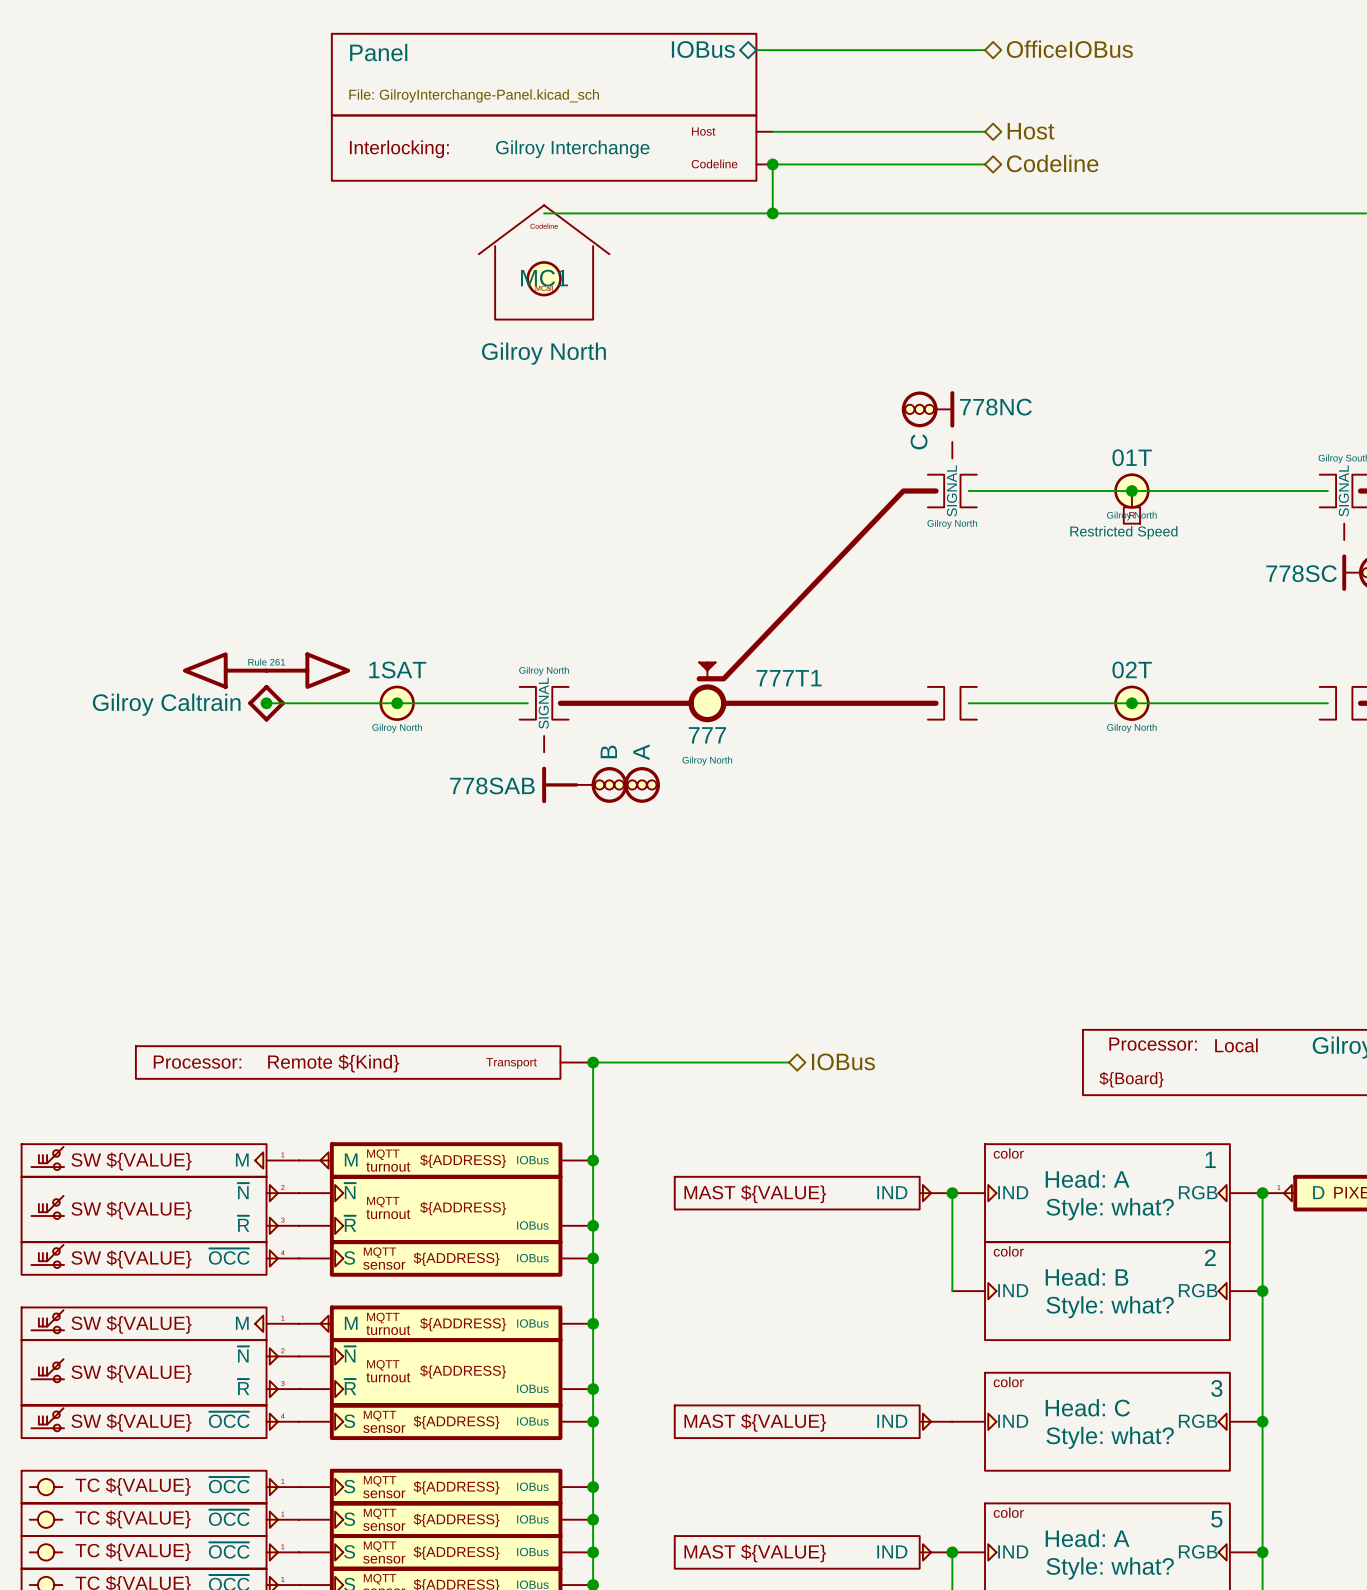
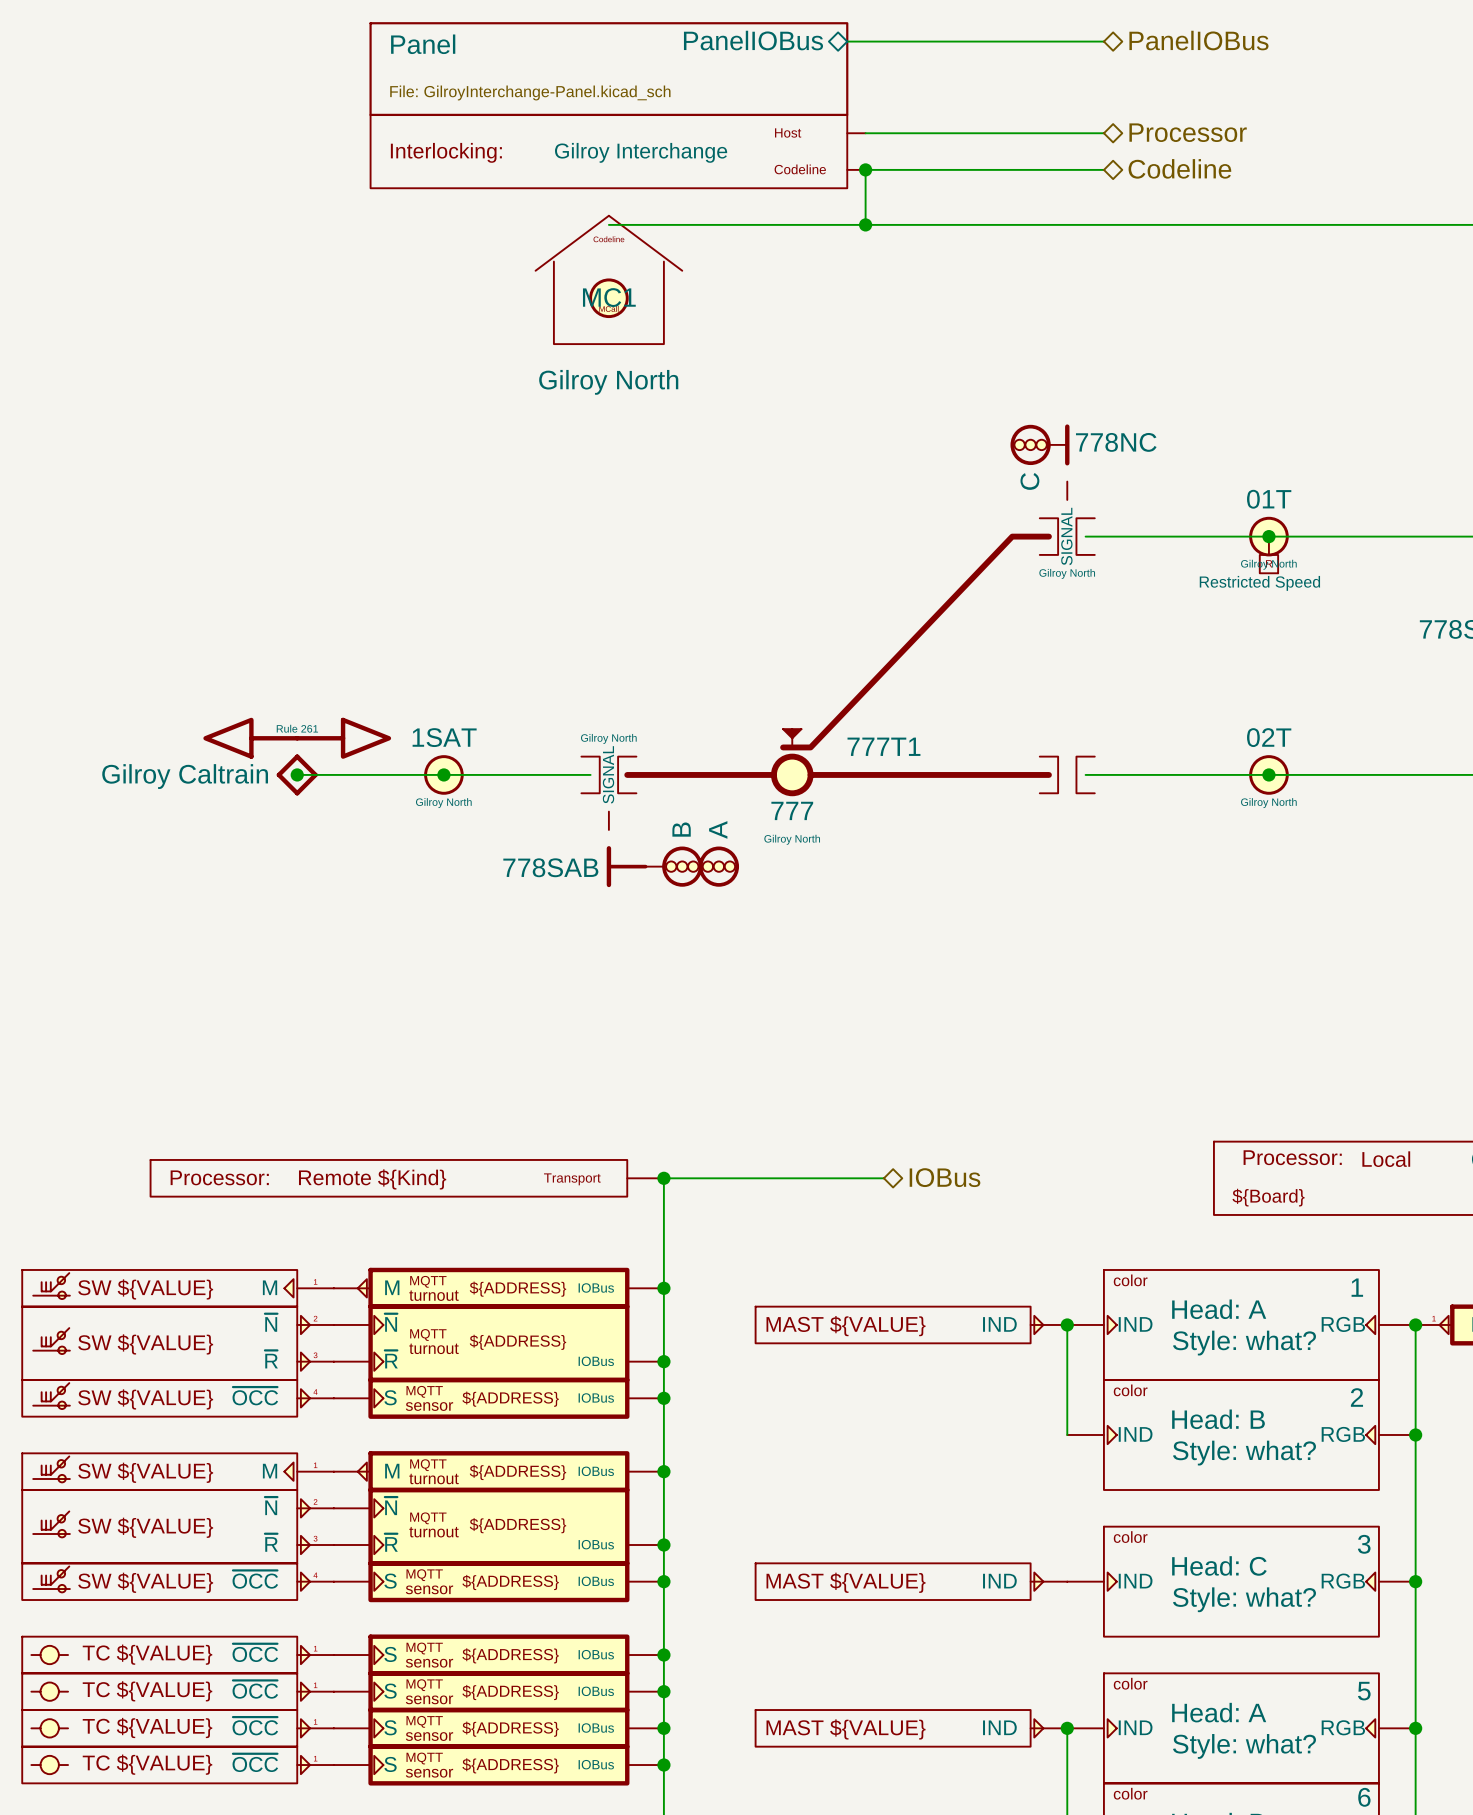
sheet pin: IOBus (703, 49) -> PanelIOBus (753, 40)
hierarchical label: OfficeIOBus (1069, 49) -> PanelIOBus (1198, 40)
hierarchical label: Host (1031, 131) -> Processor (1188, 132)

